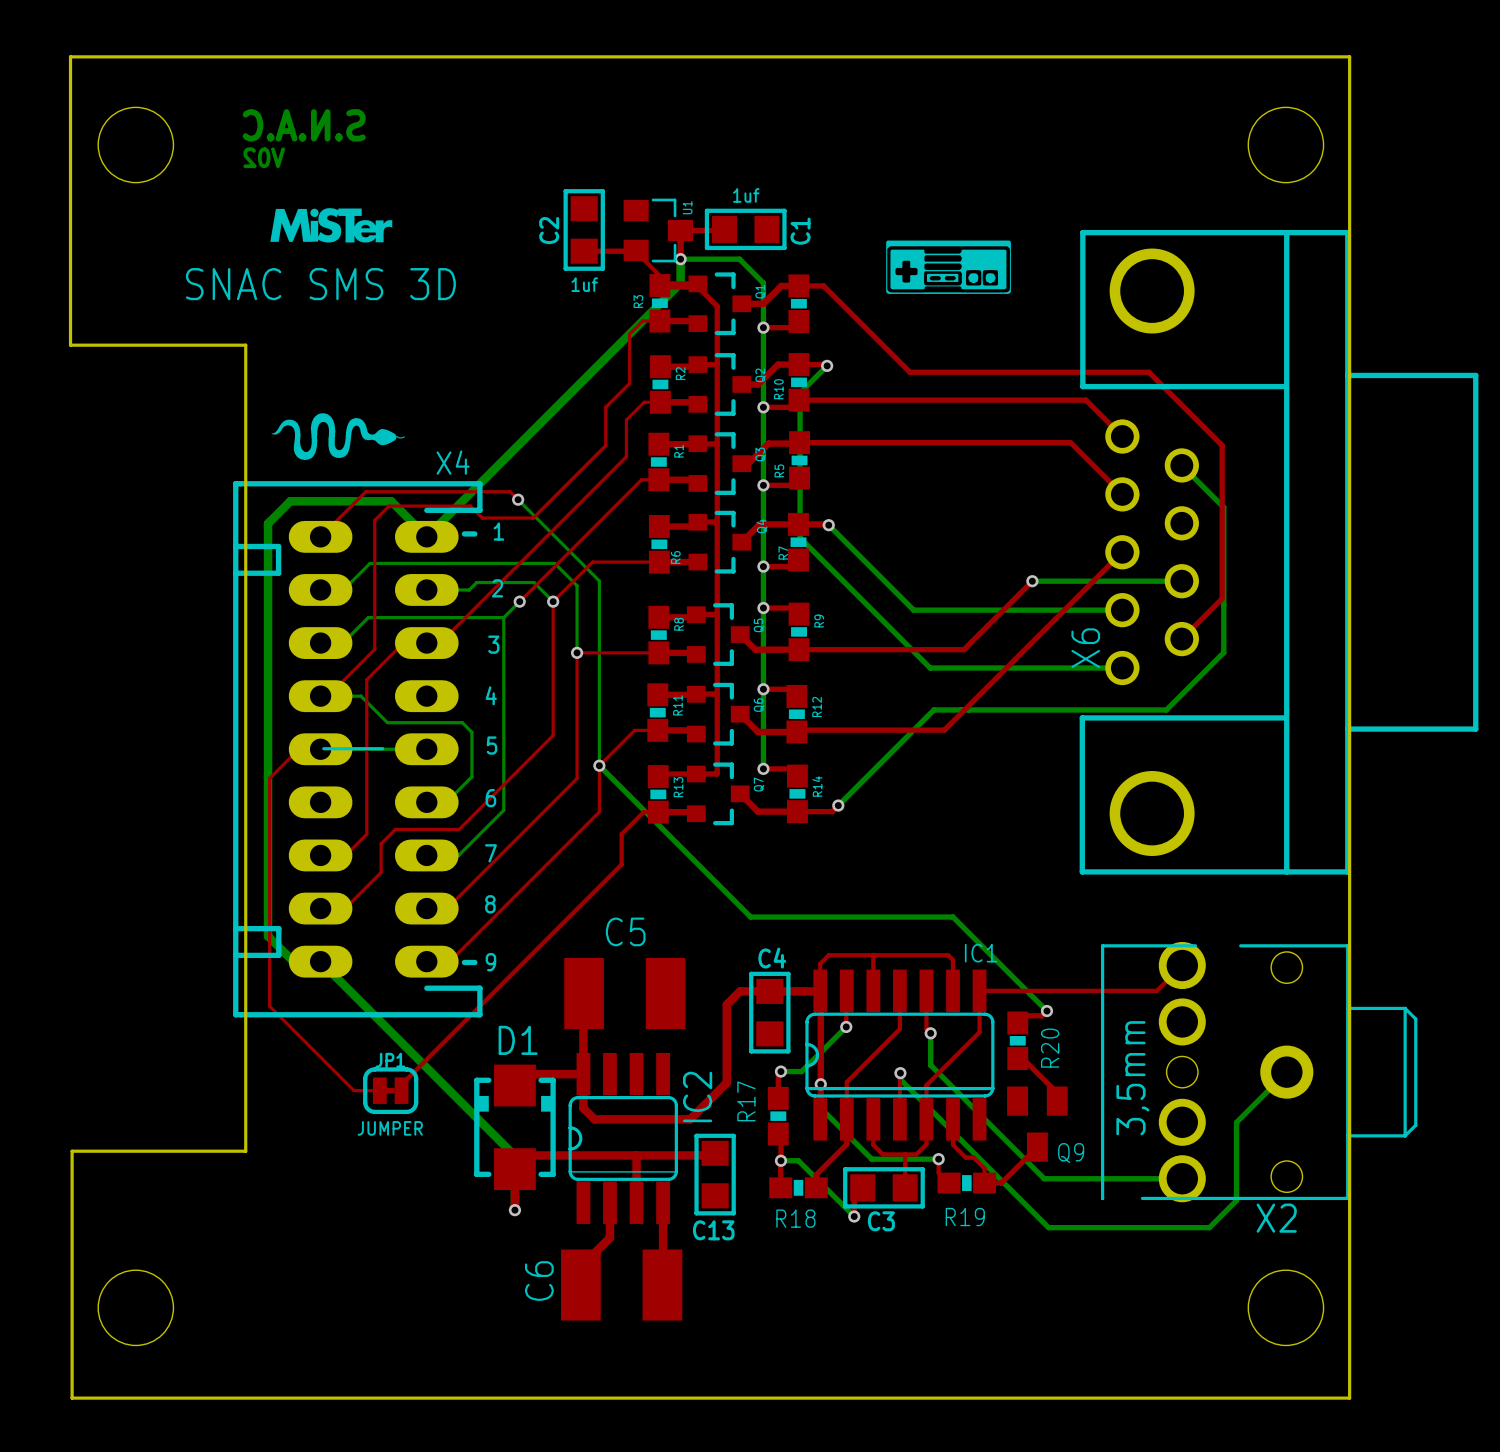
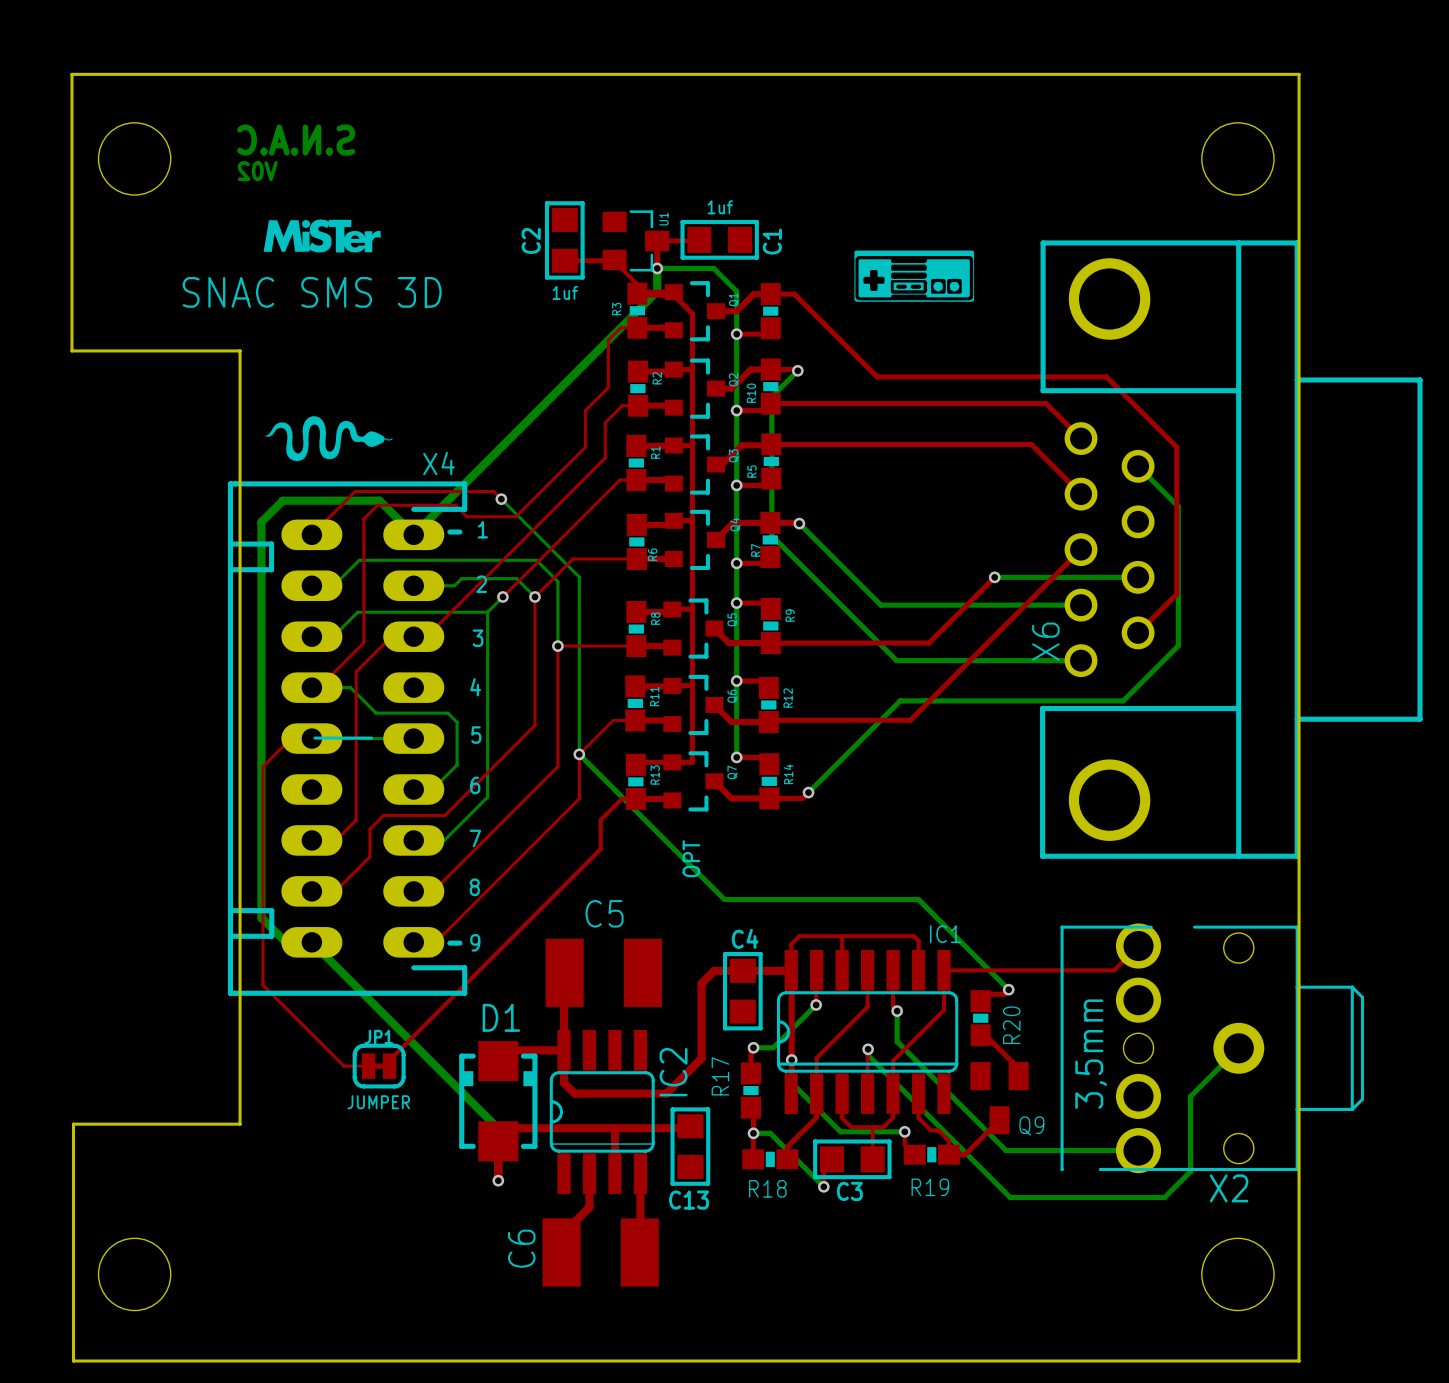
text: none -> OPT (691, 858)

